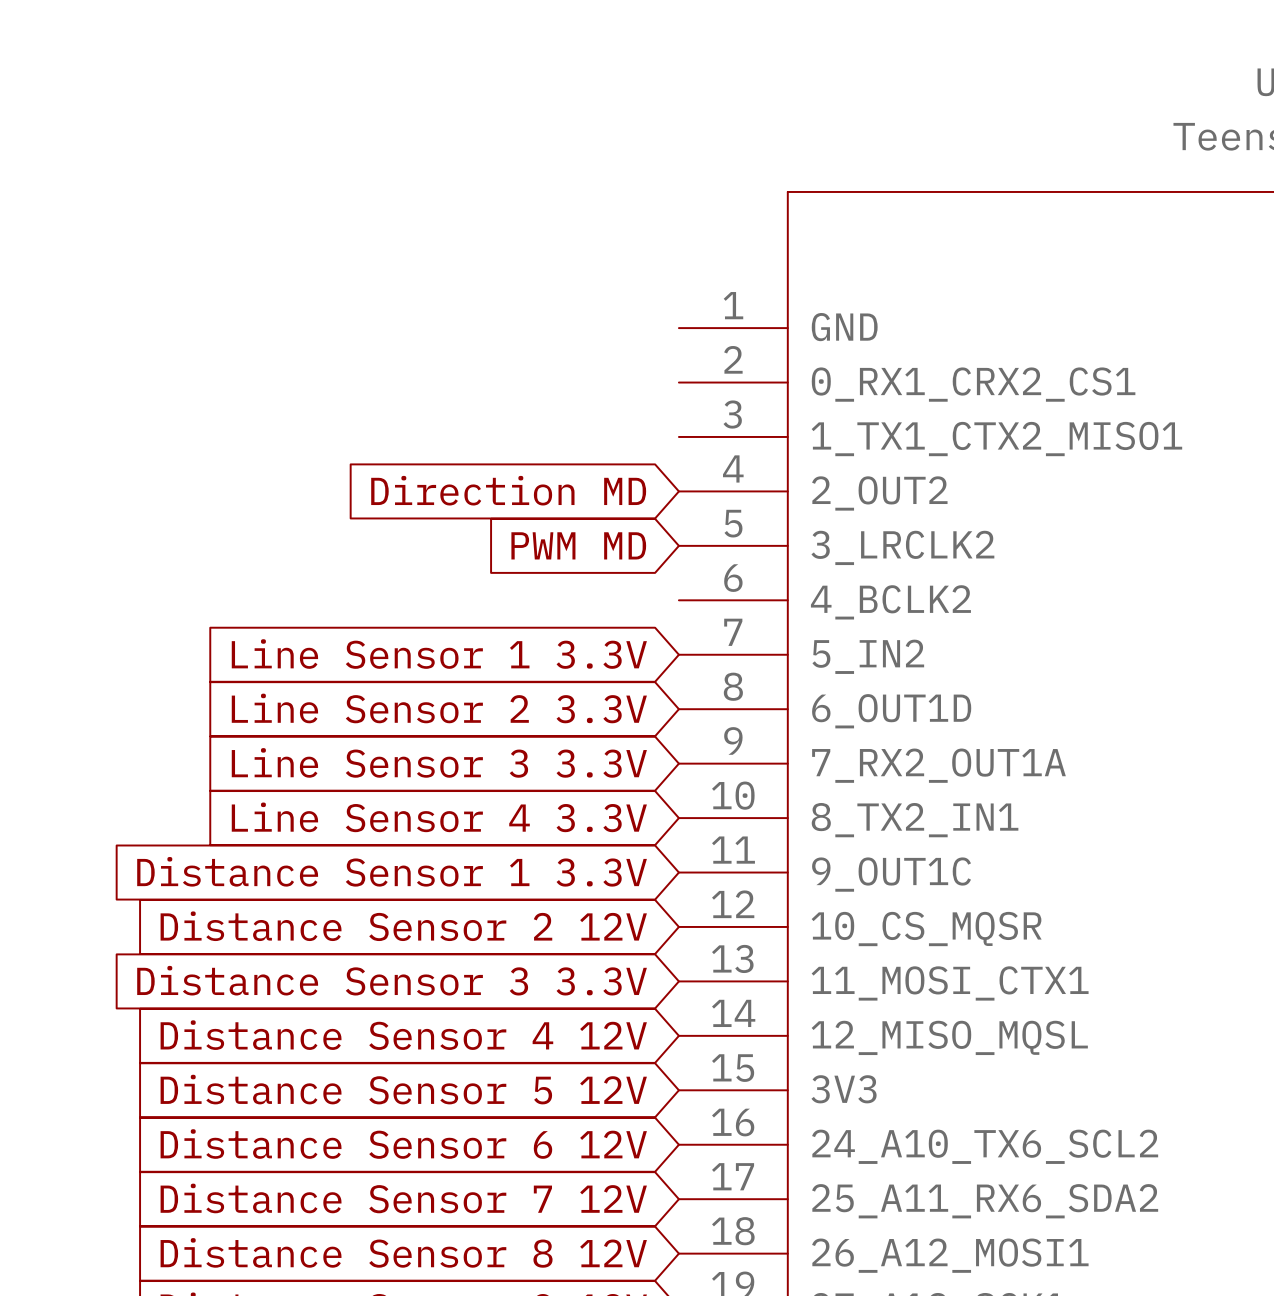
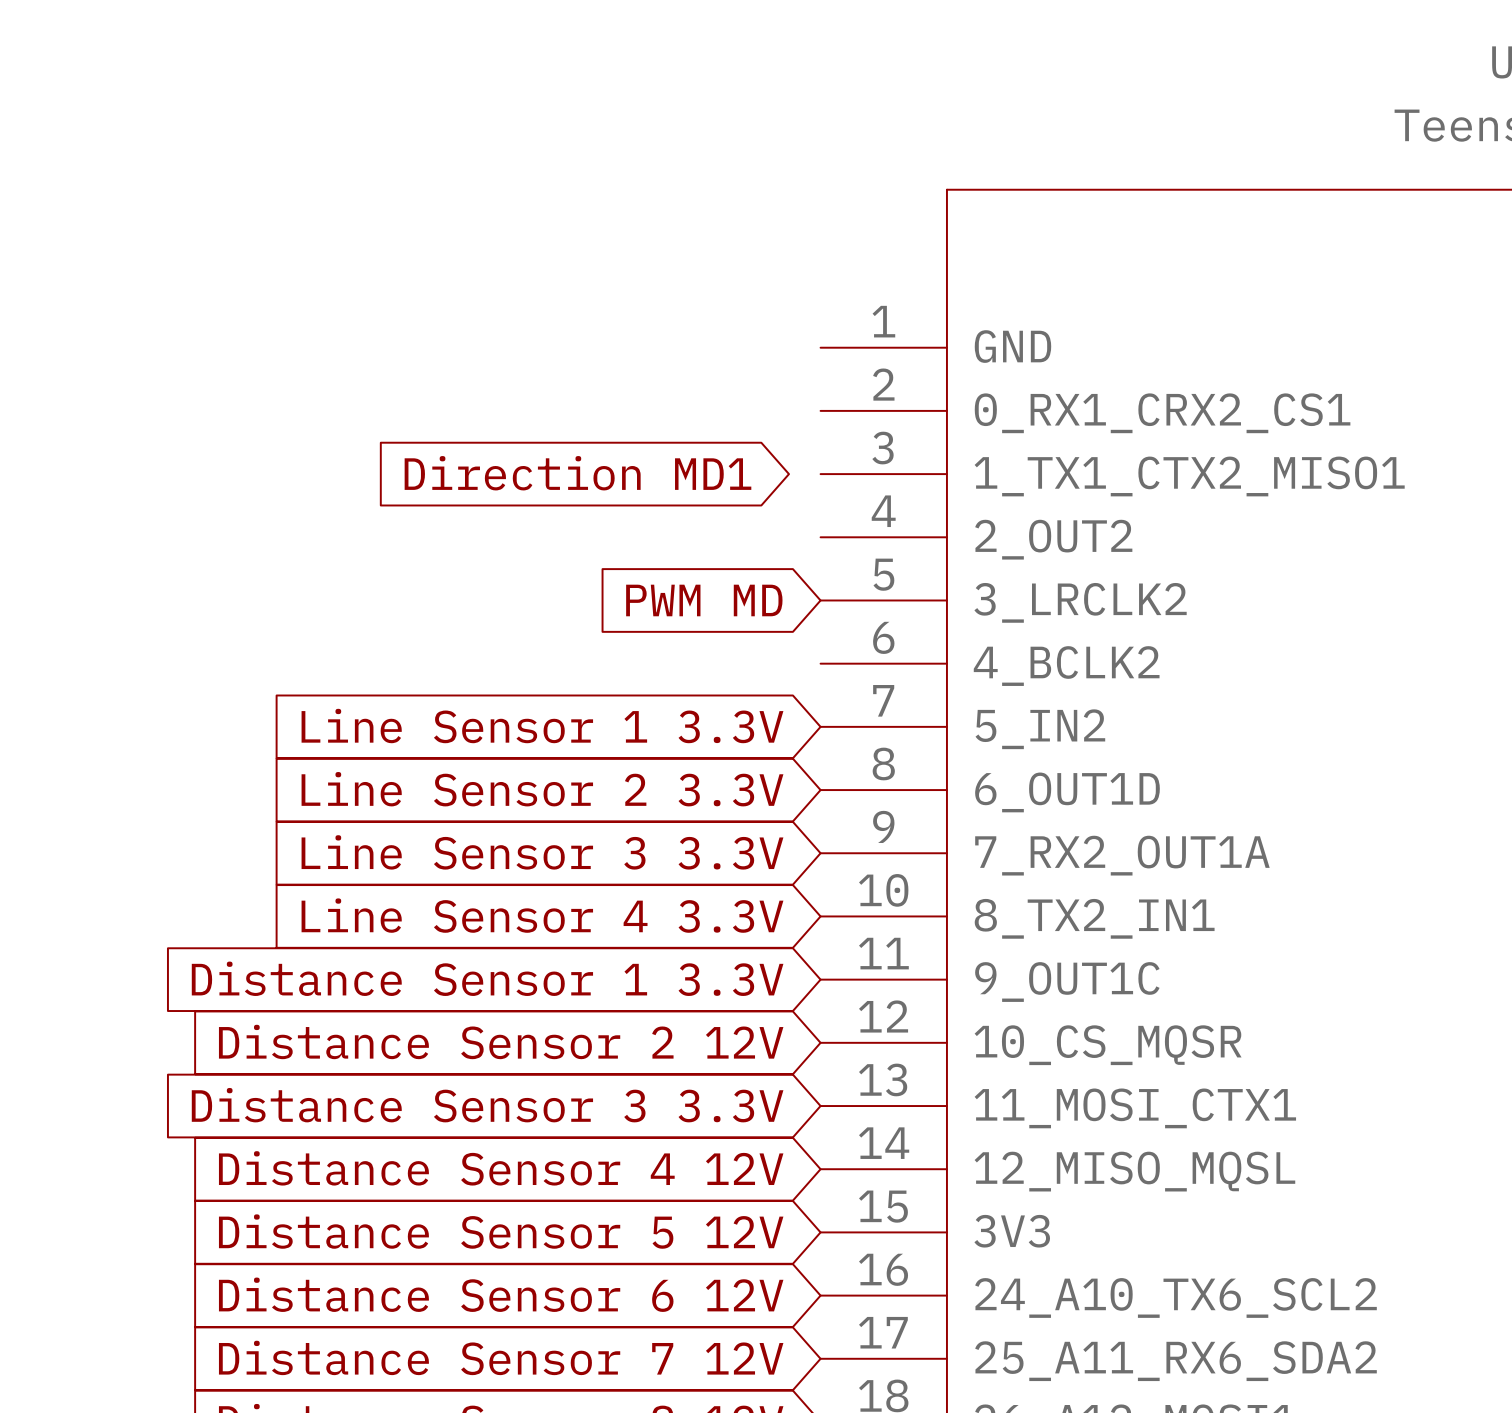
global label: Direction MD (508, 490) -> Direction MD1 (577, 473)

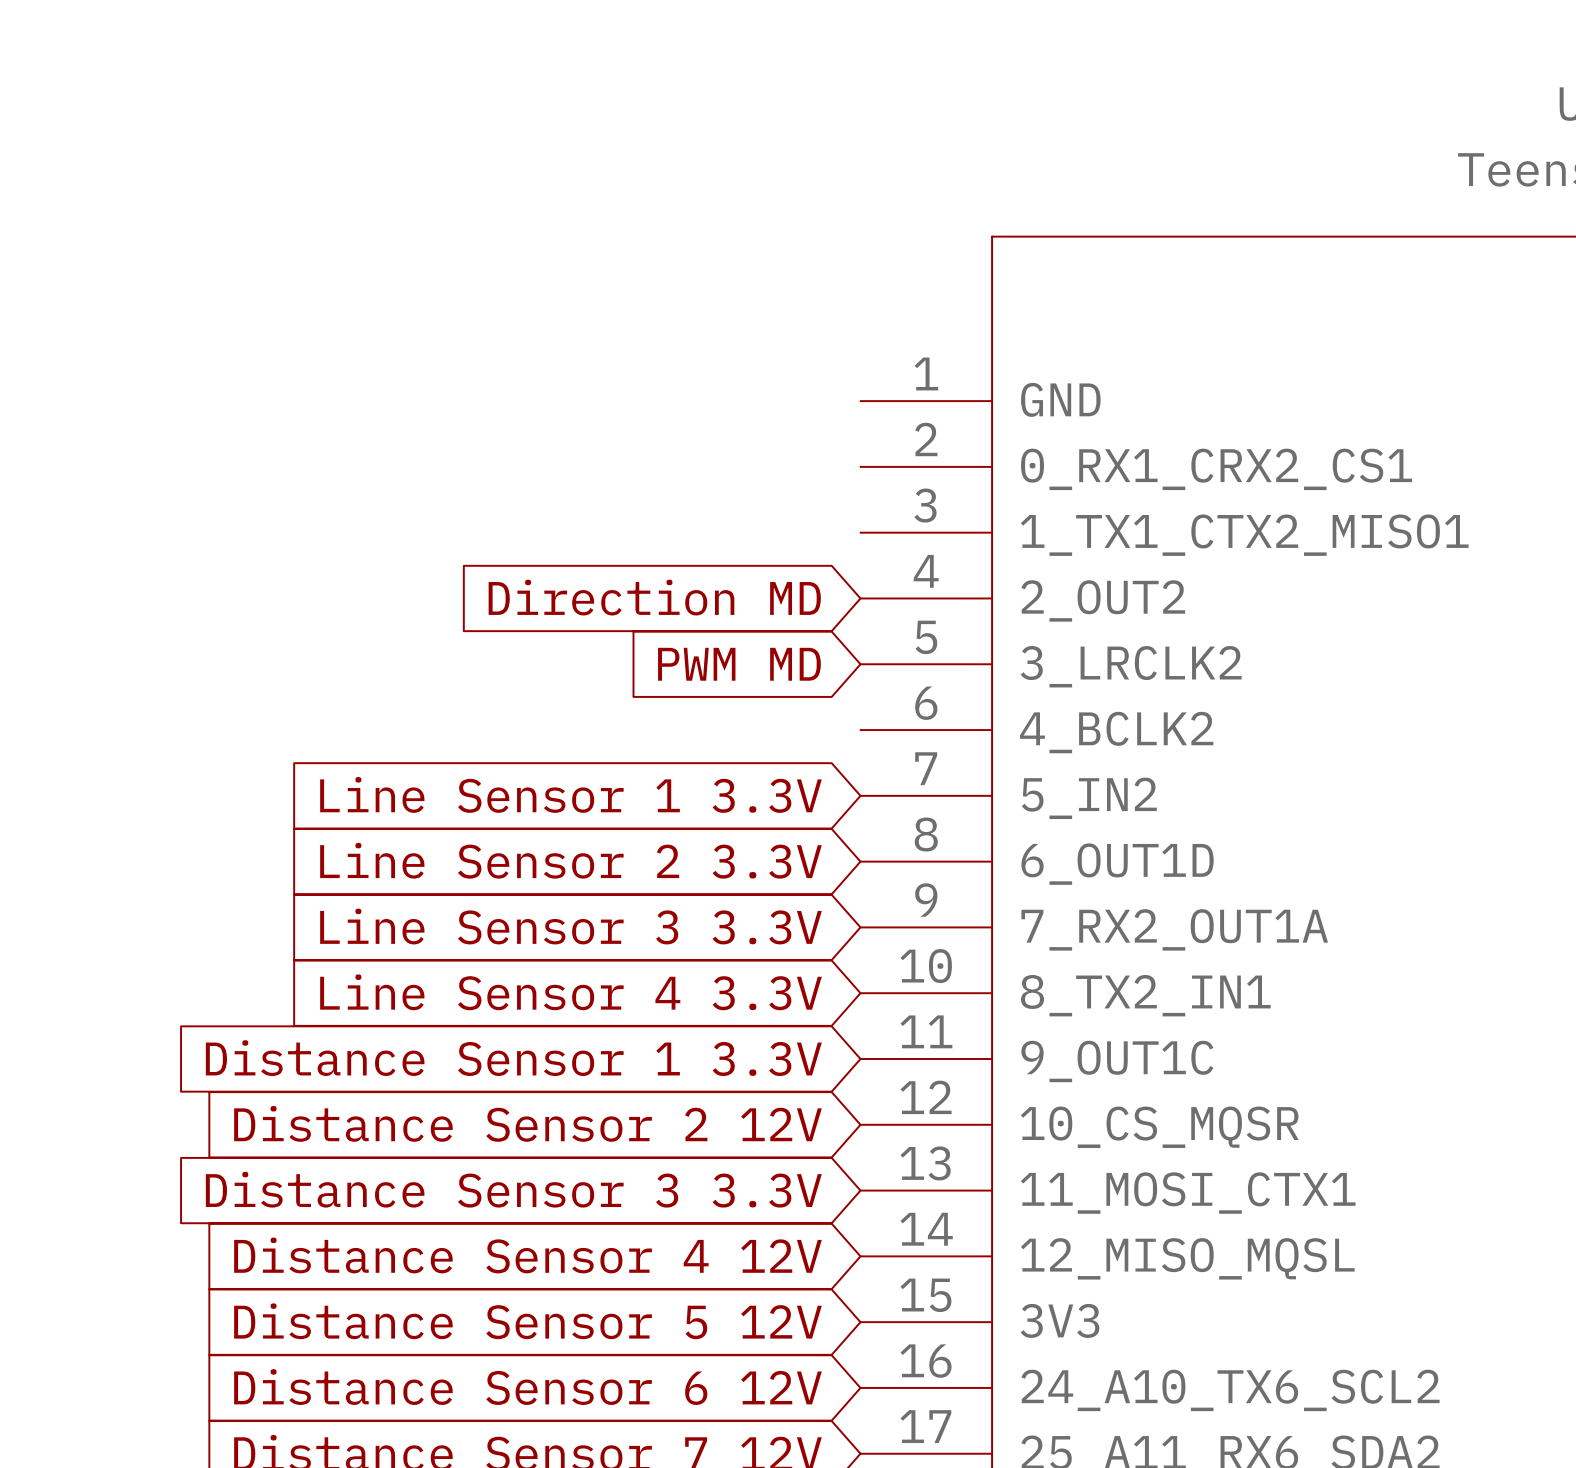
global label: Direction MD1 (577, 473) -> Direction MD (654, 597)

